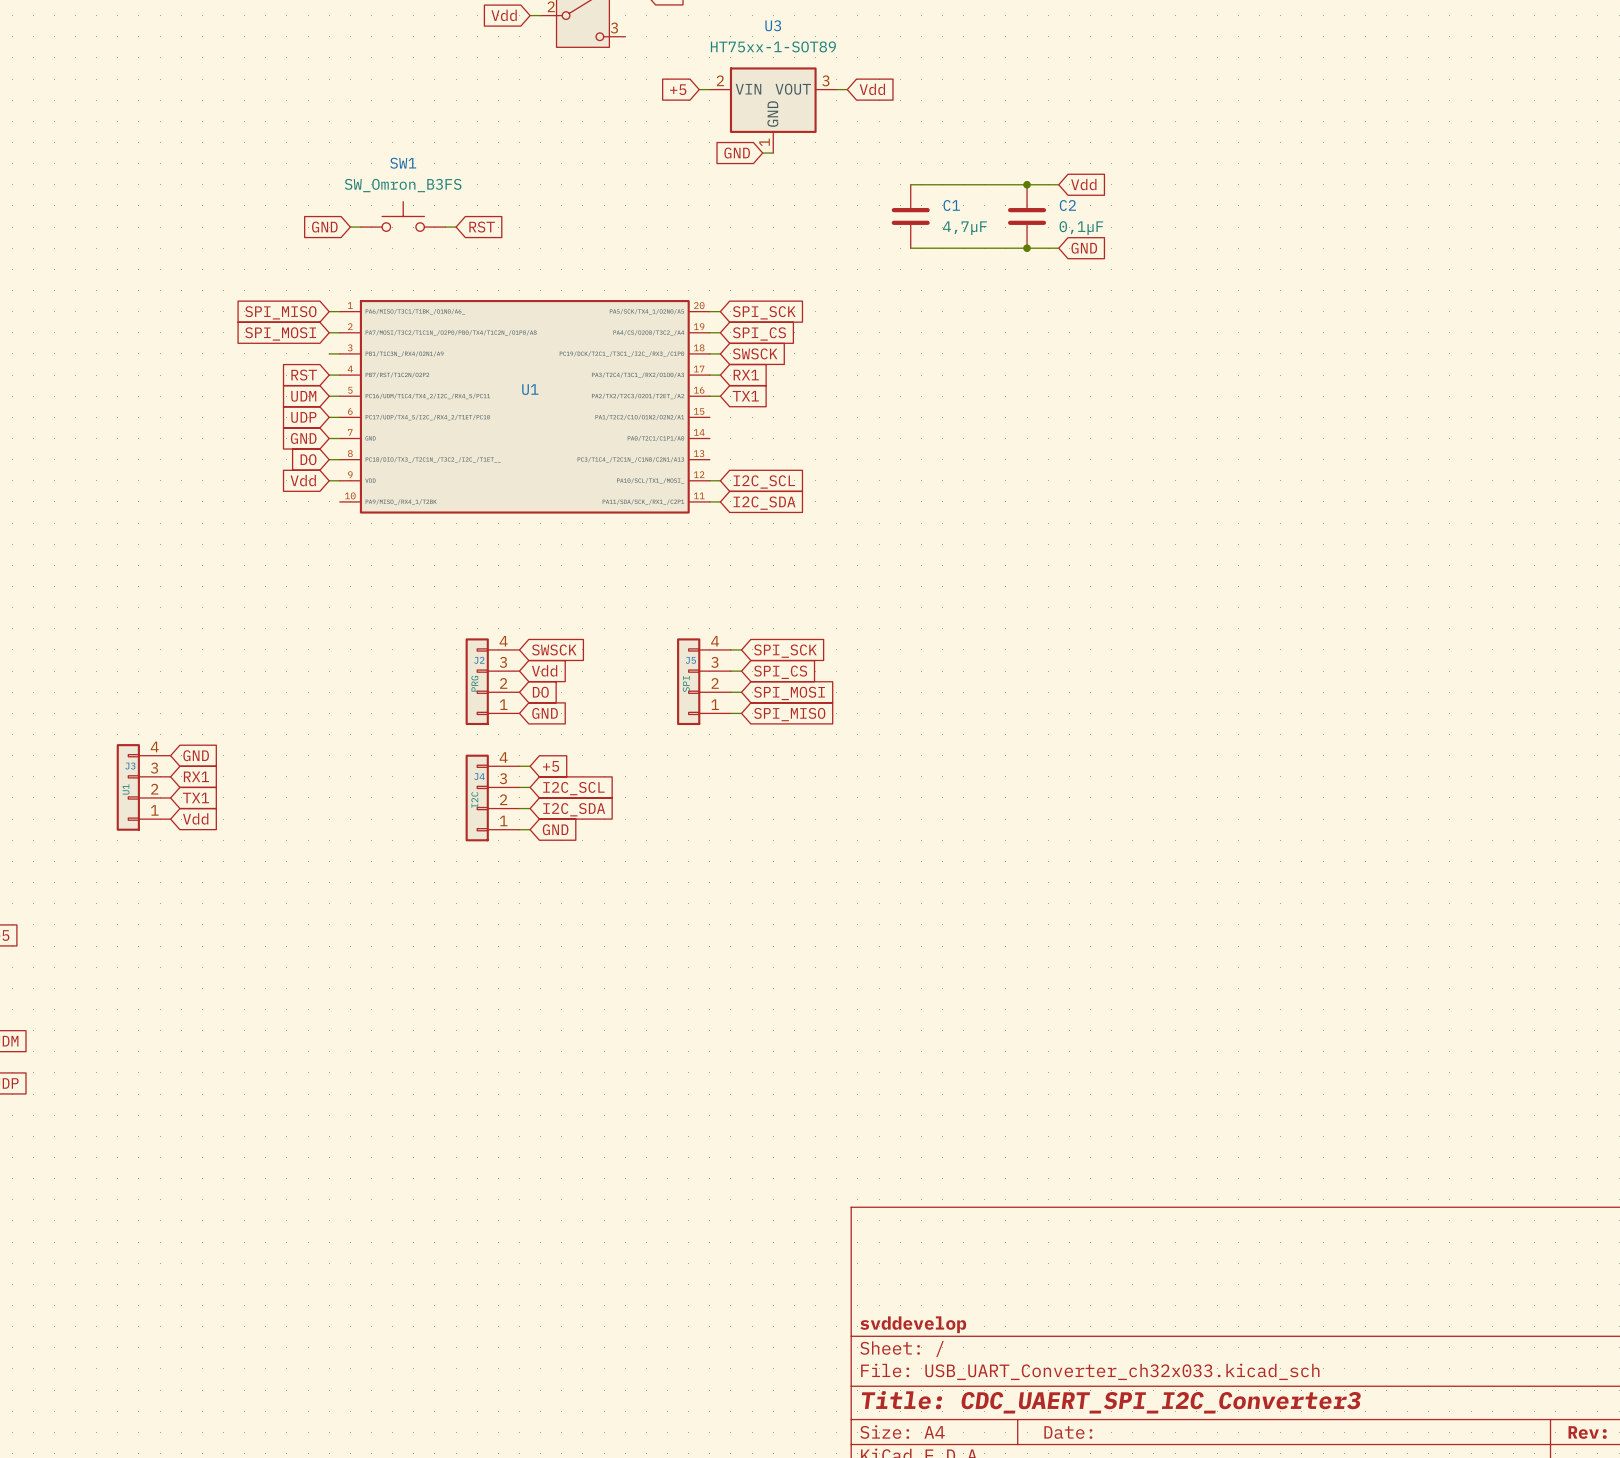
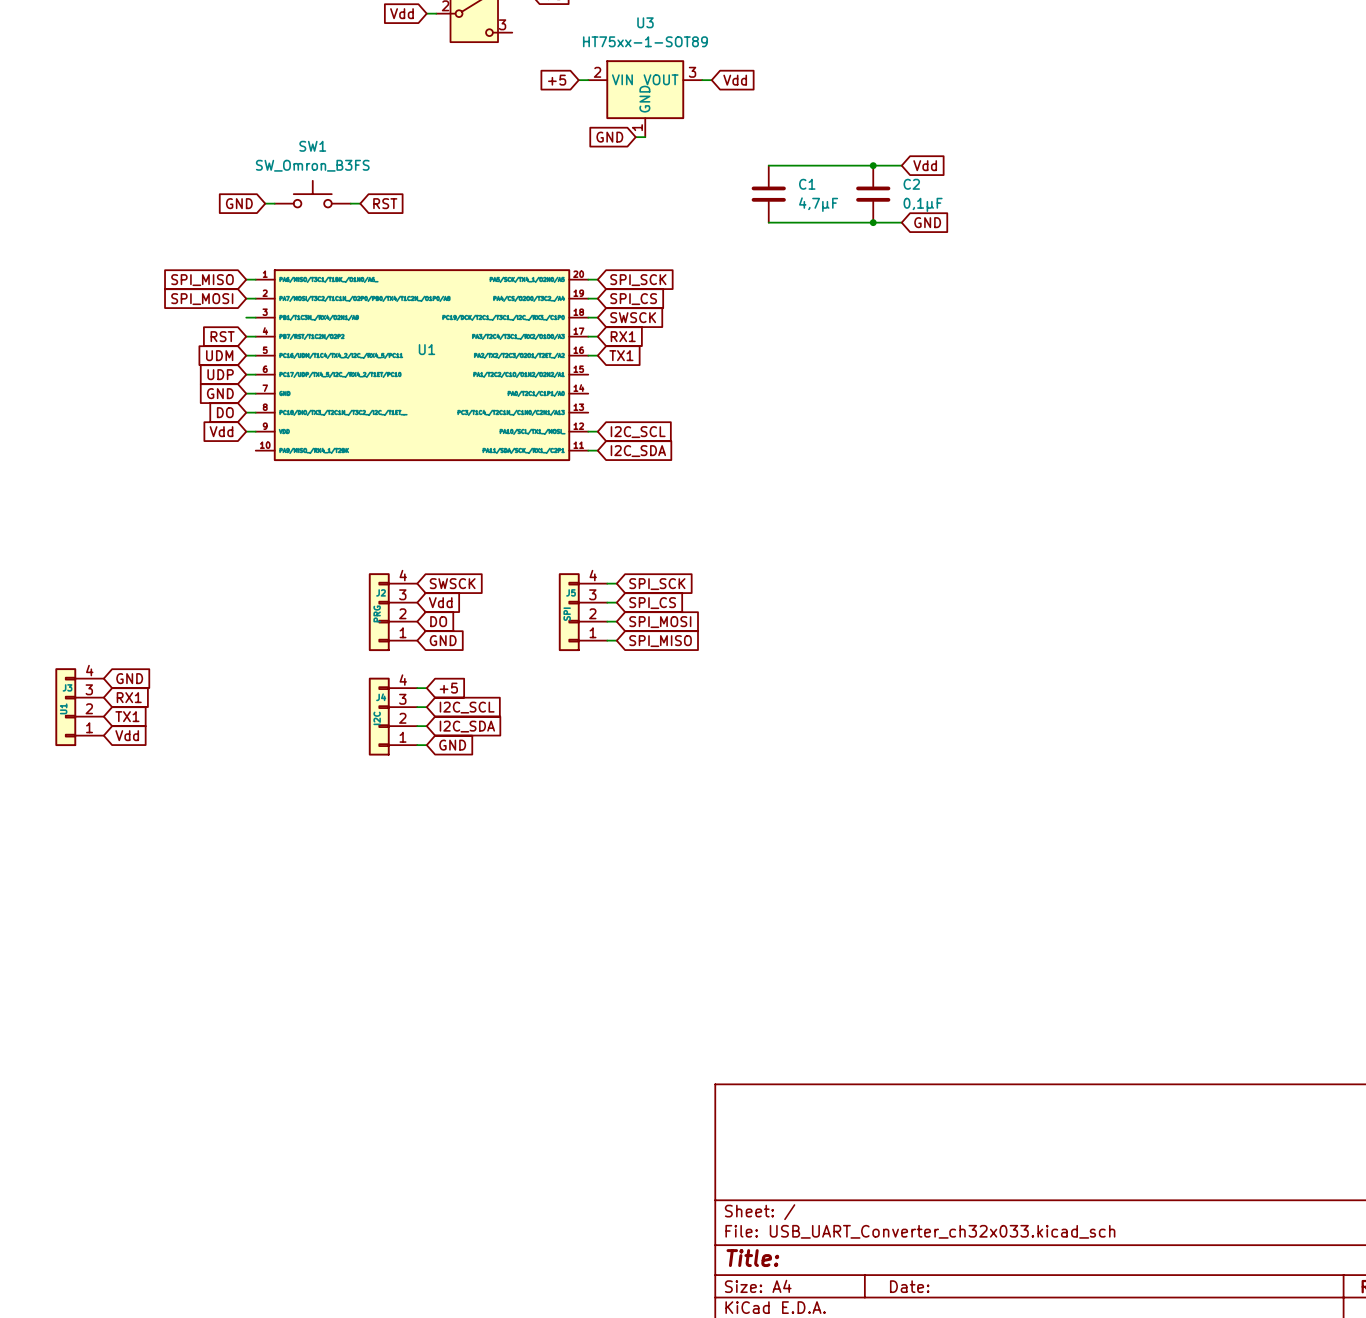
title block: svddevelop (913, 1324) -> none
title block: Title: CDC_UAERT_SPI_I2C_Converter3 (1111, 1402) -> Title: (752, 1258)

